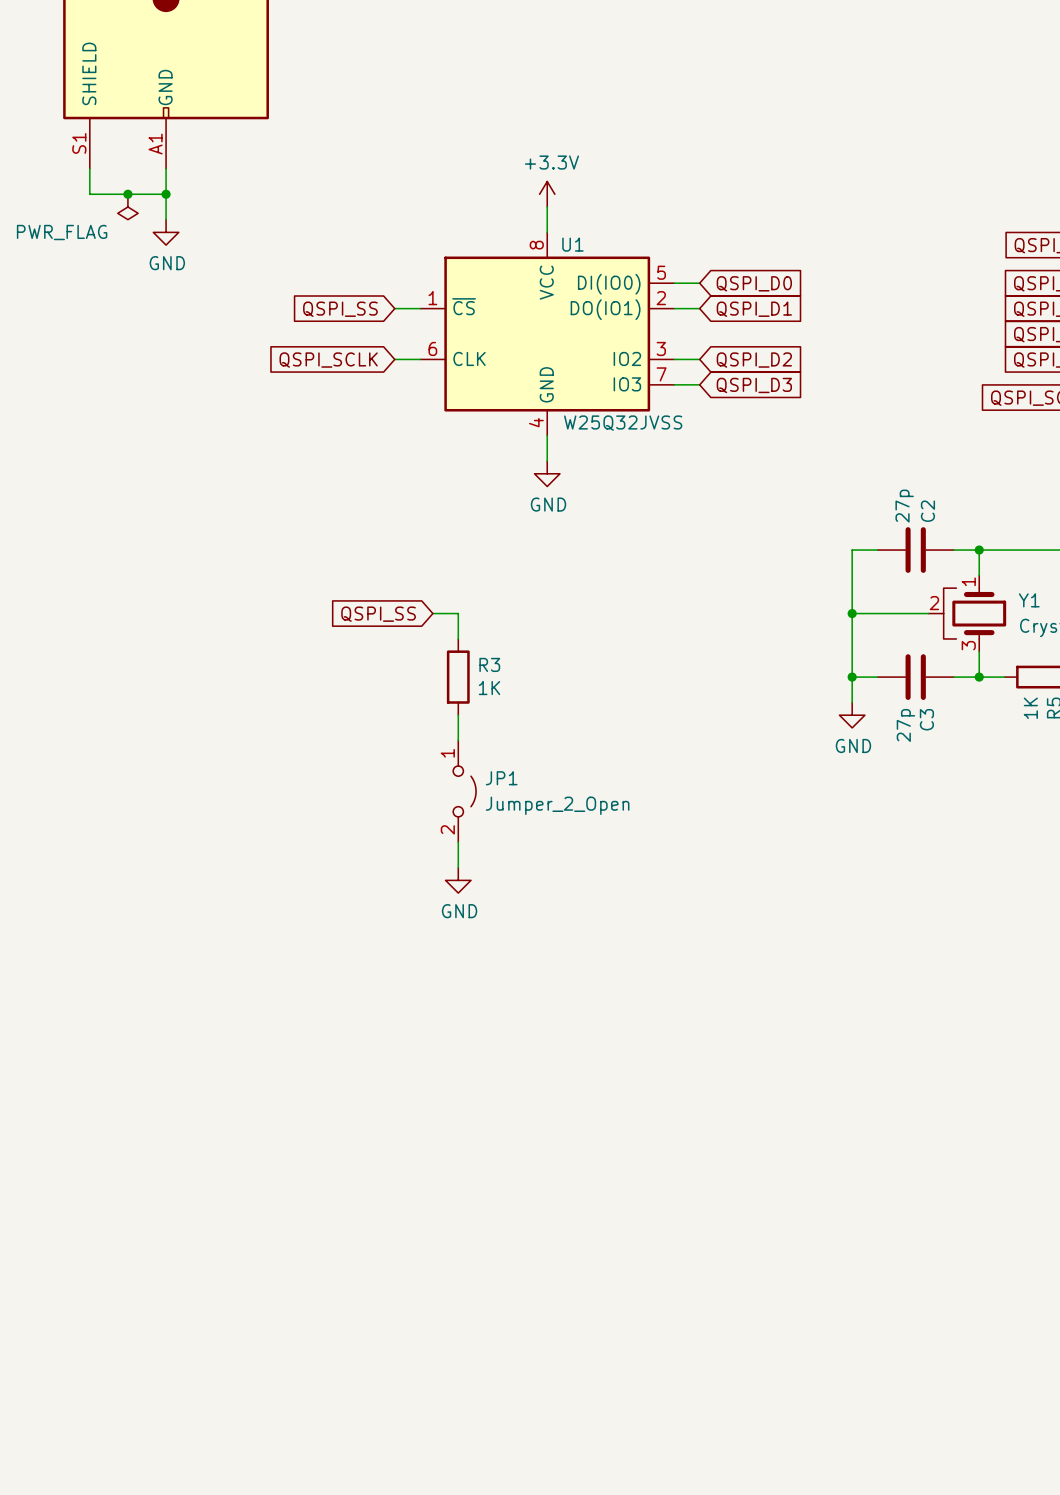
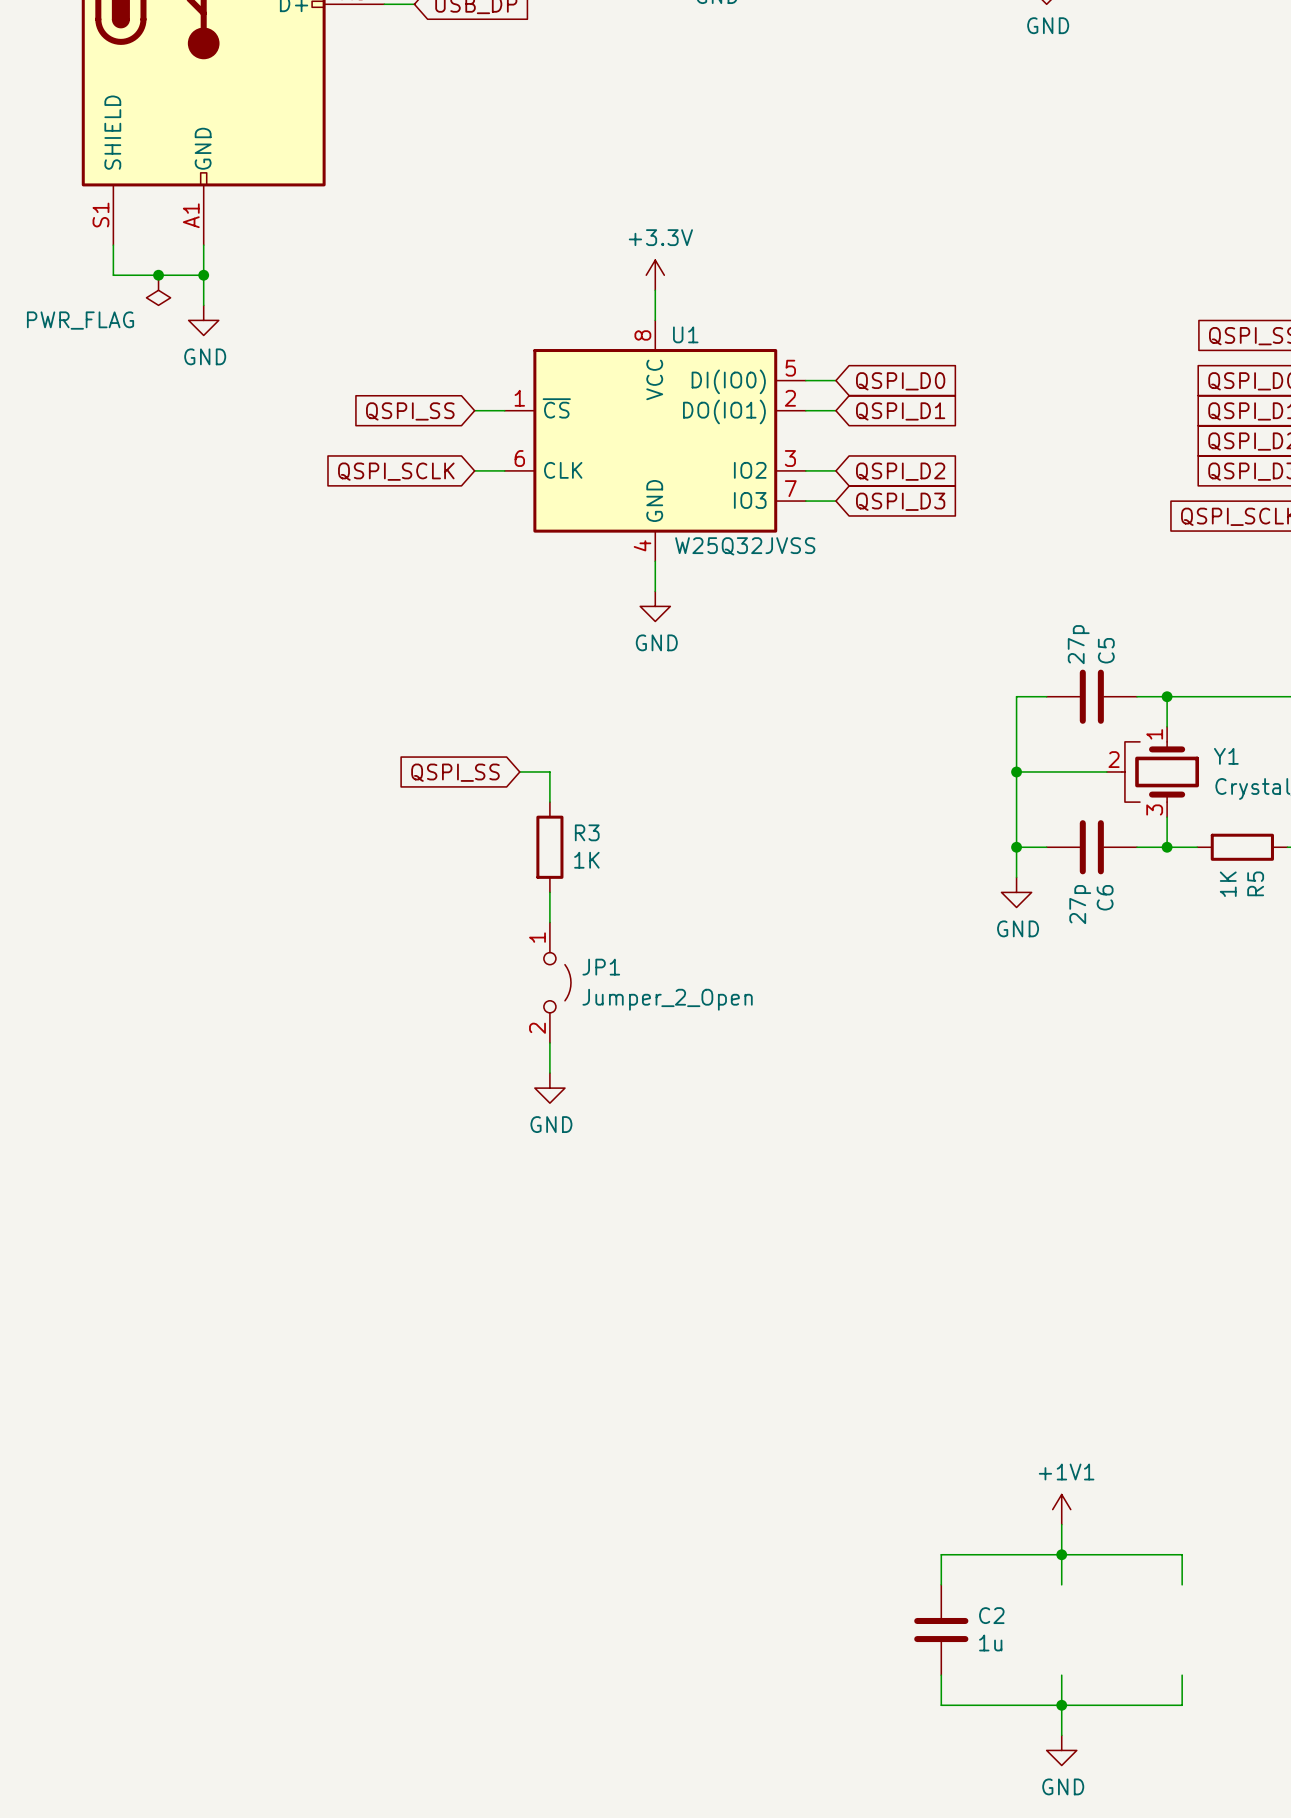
C2 name: C2 (927, 511) -> C5 (1106, 650)
C3 name: C3 (926, 719) -> C6 (1105, 897)
power symbol: none -> +1V1 (1061, 1509)
wire: none -> (1061, 1524) (1061, 1584)
junction: none -> (1061, 1554)
wire: none -> (941, 1584) (941, 1554) (1182, 1554) (1182, 1584)
C2: none -> 1u (941, 1630)
wire: none -> (941, 1675) (941, 1705) (1182, 1705) (1182, 1675)
wire: none -> (1061, 1675) (1061, 1735)
junction: none -> (1061, 1705)
power symbol: none -> GND (1061, 1750)

